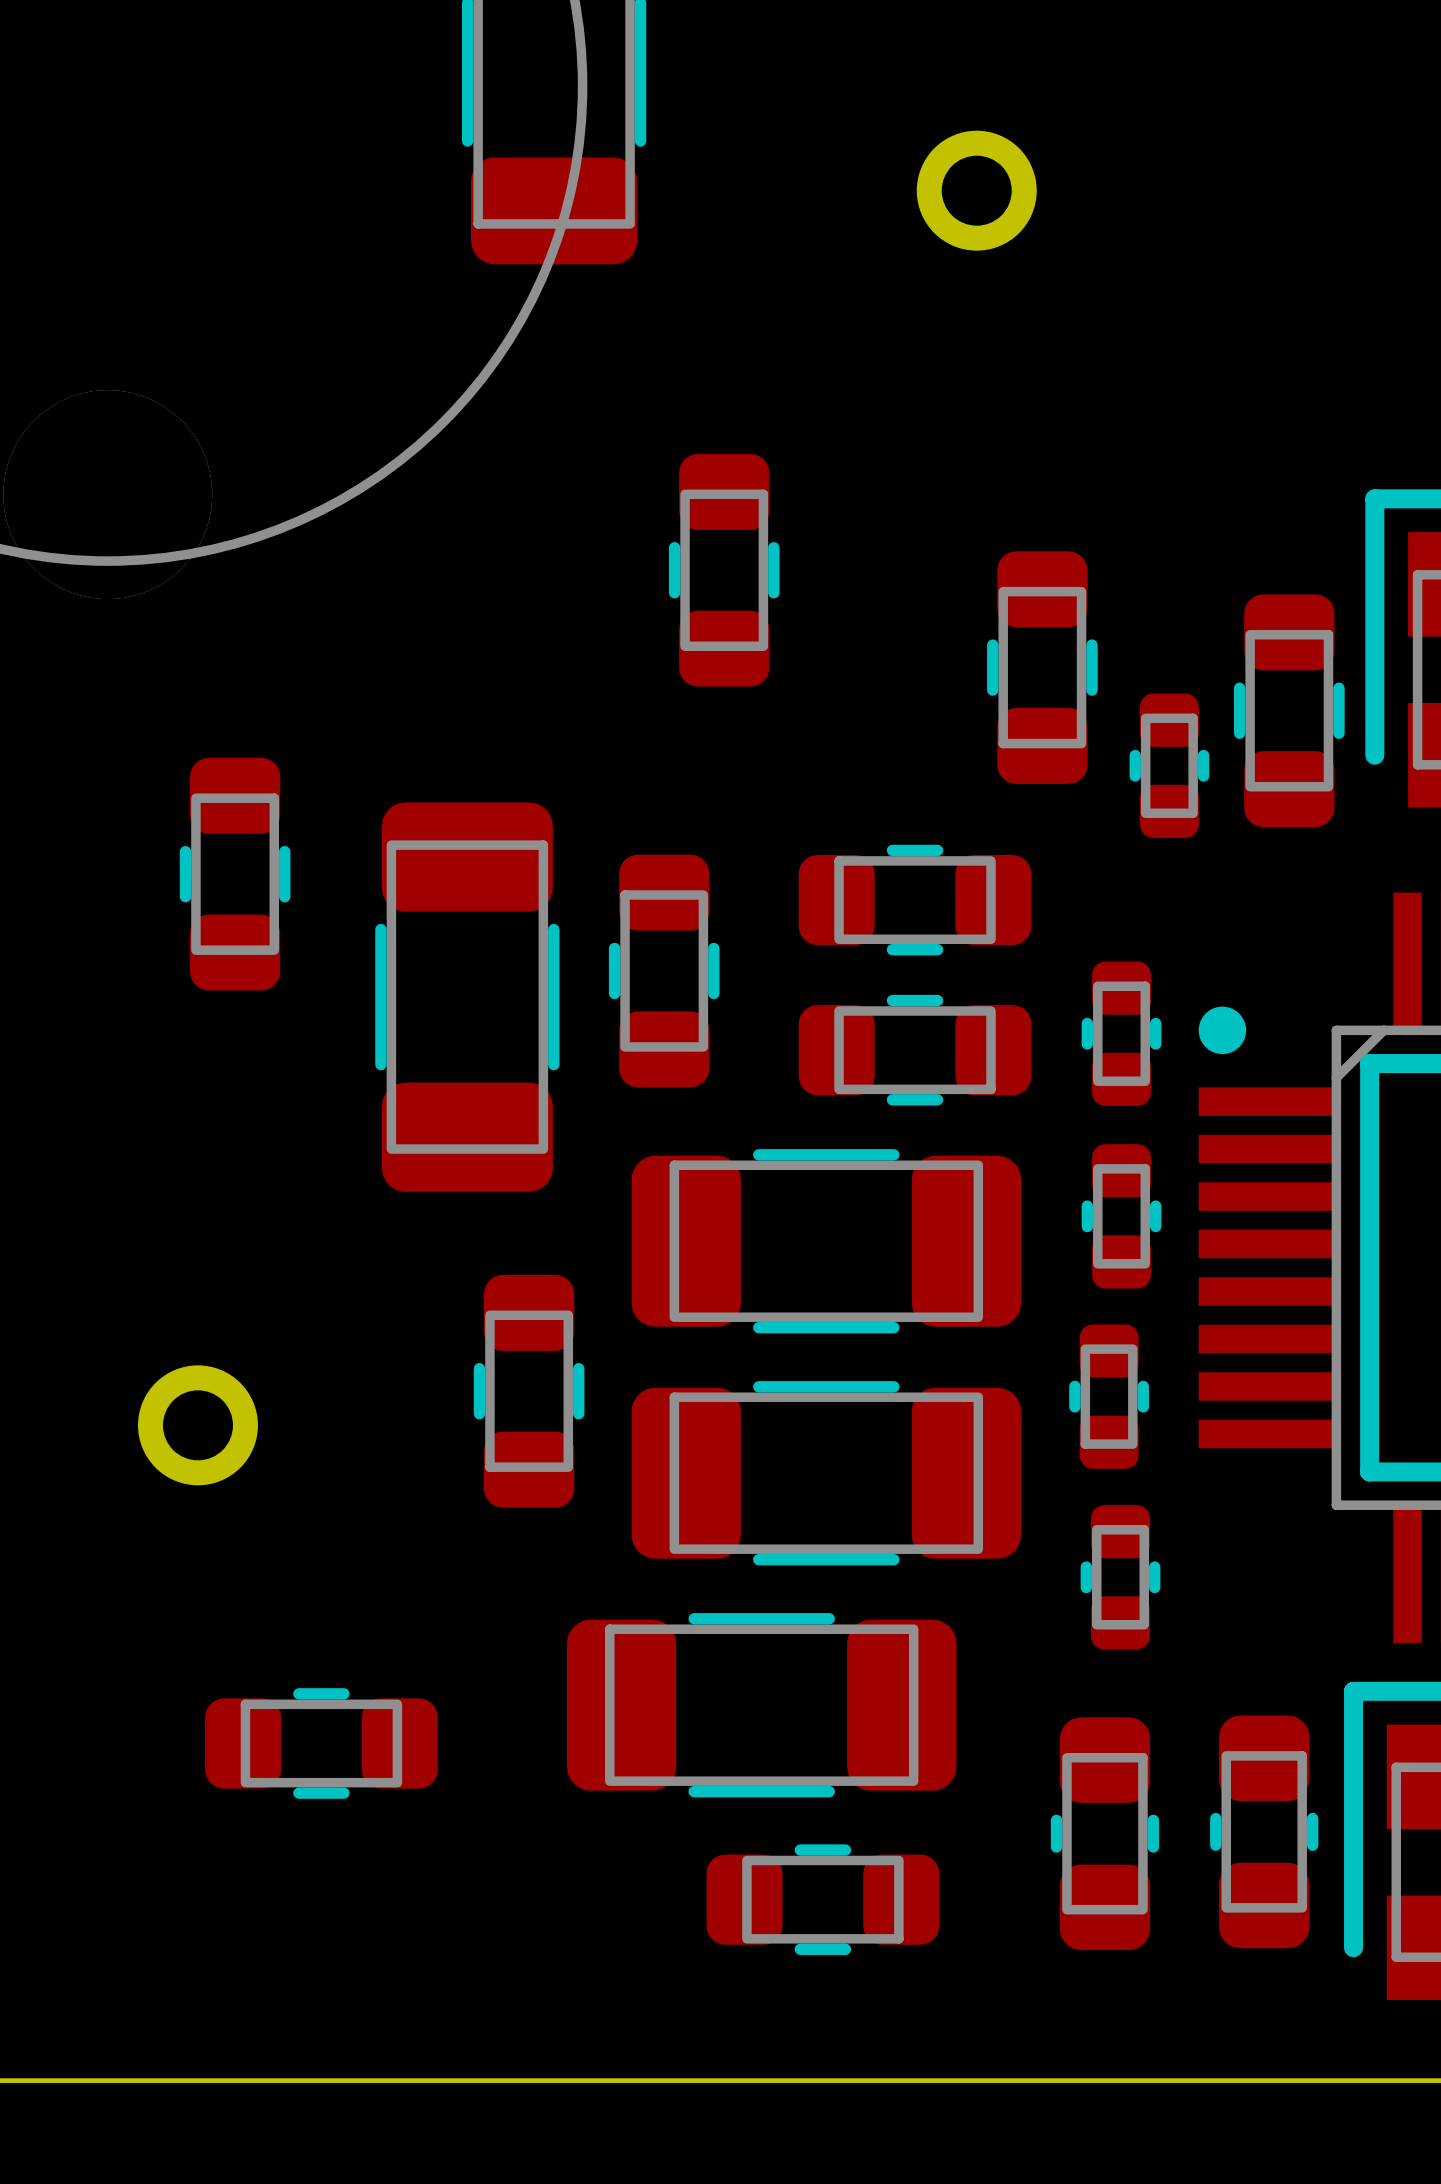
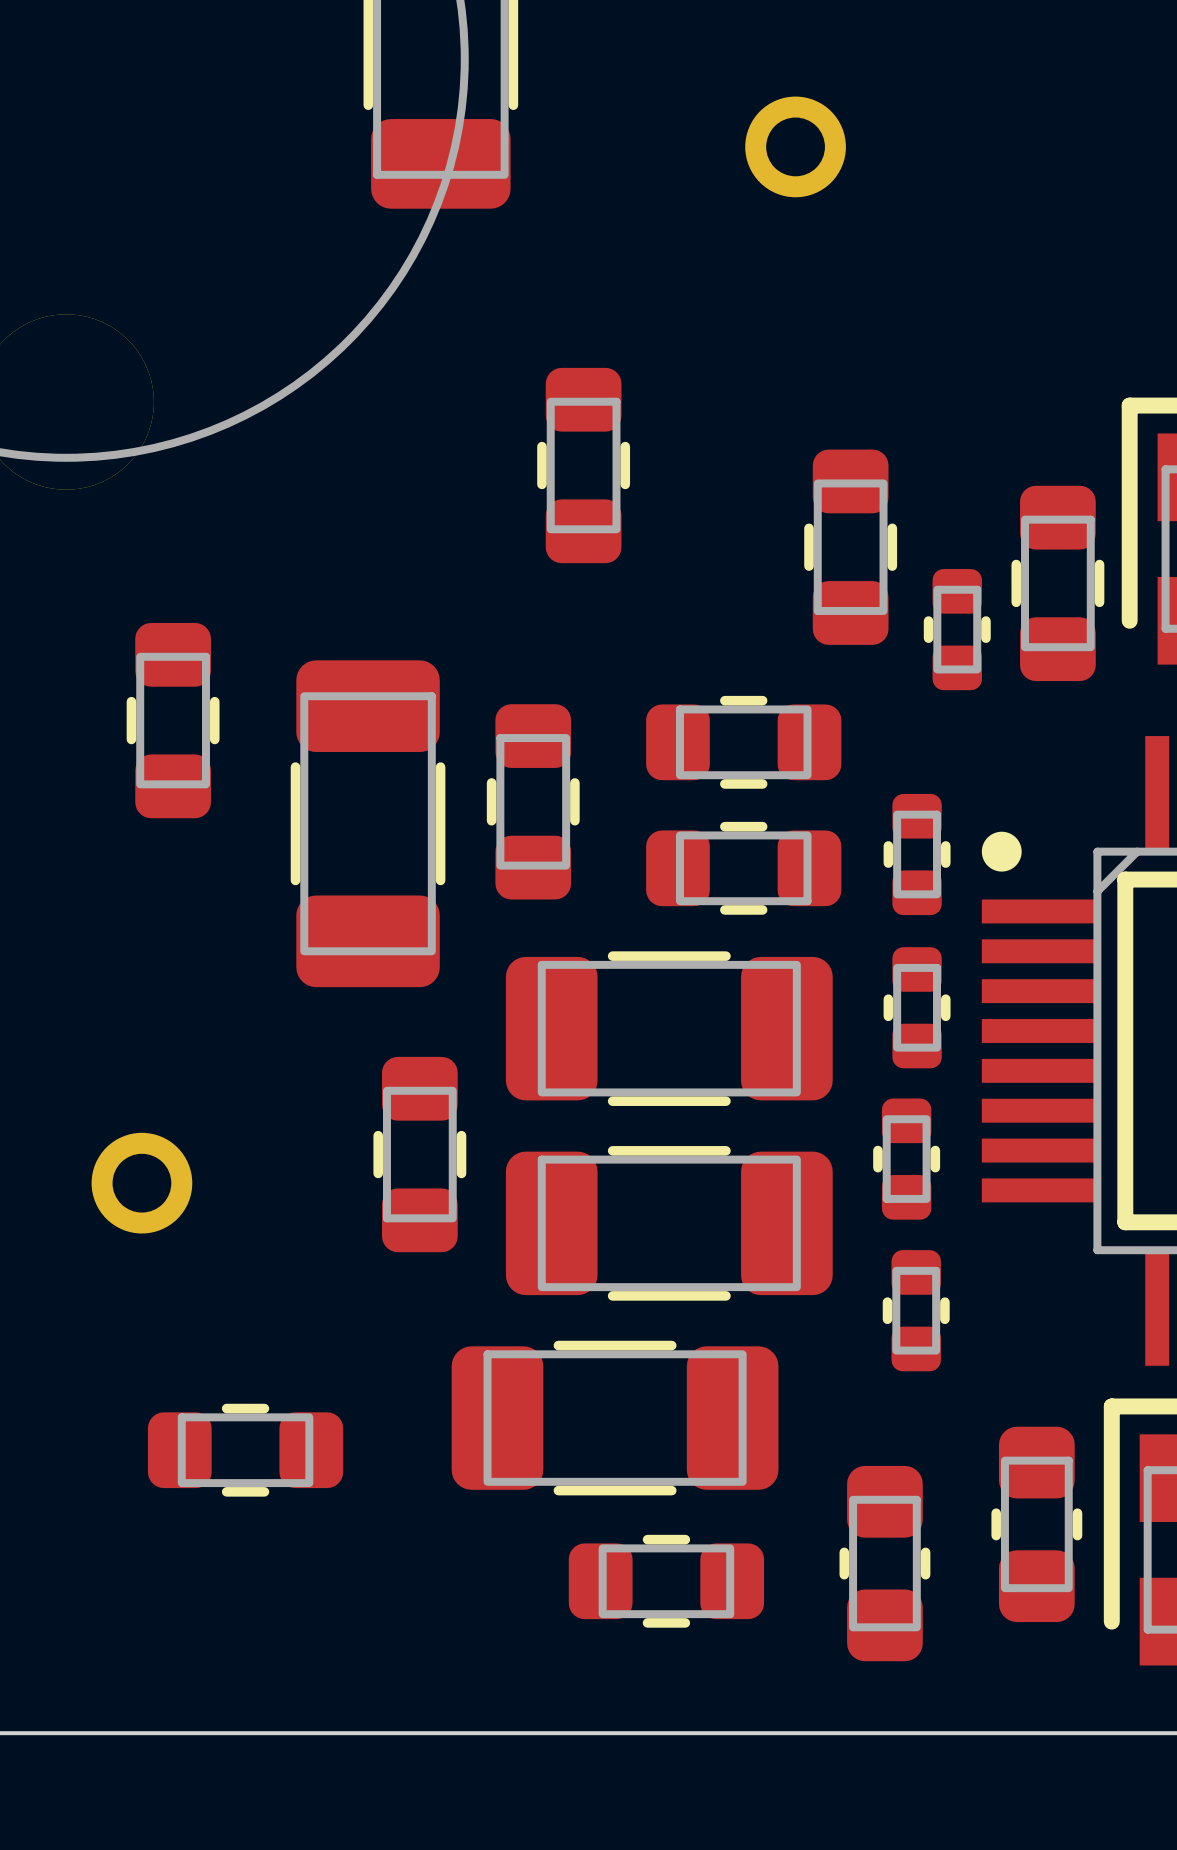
part position: (1104, 1833) -> (884, 1563)

